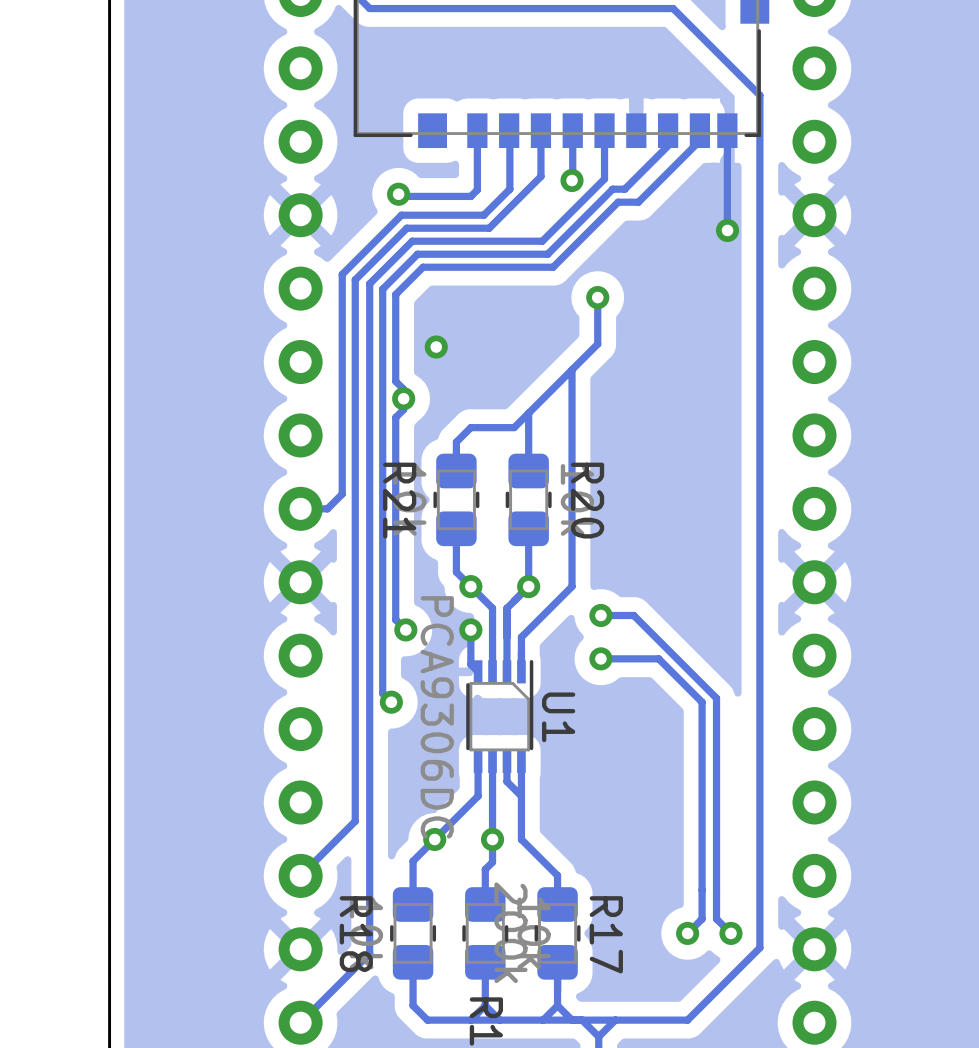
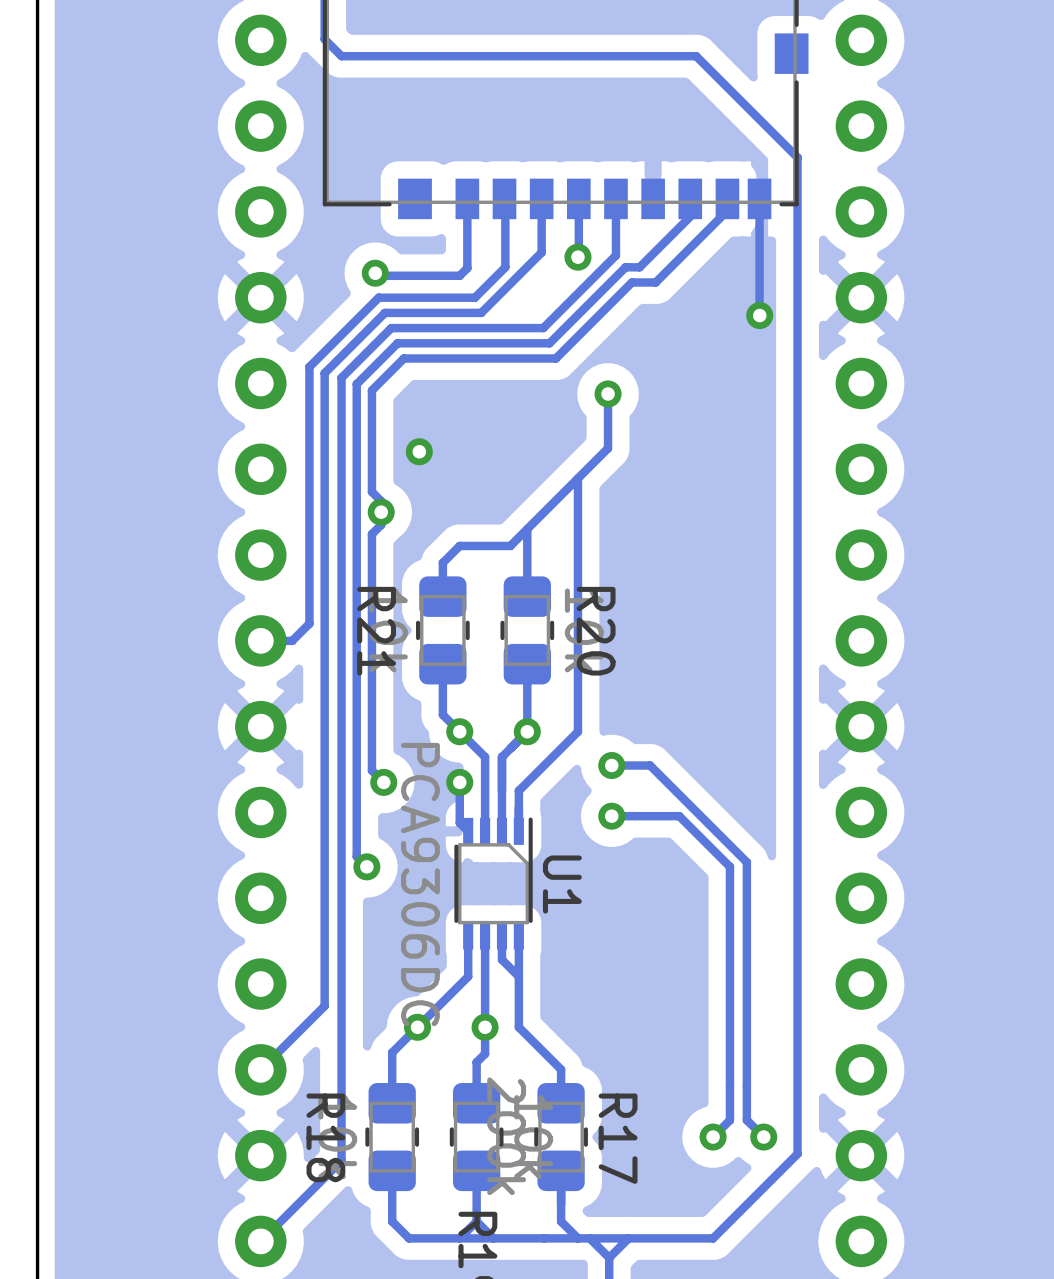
track: (557, 1005) (543, 1020) -> none

